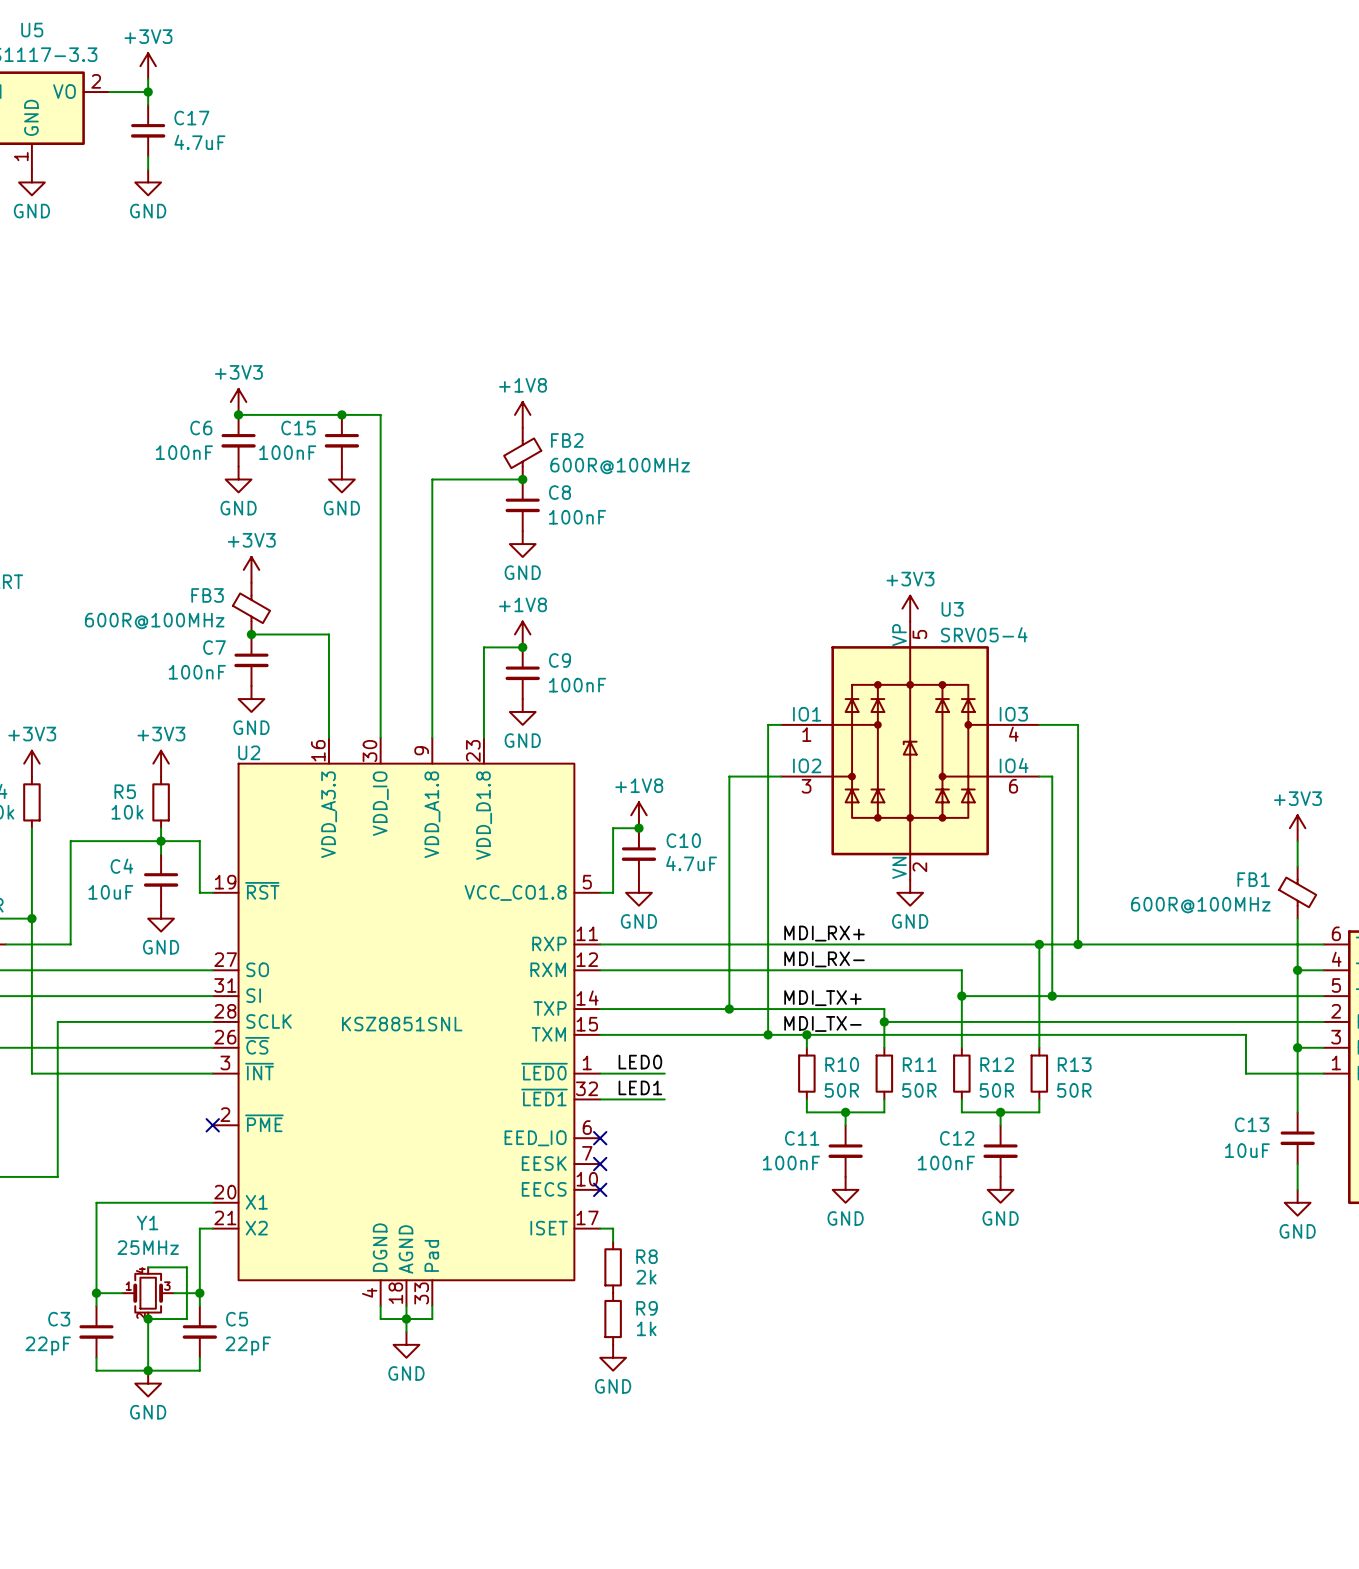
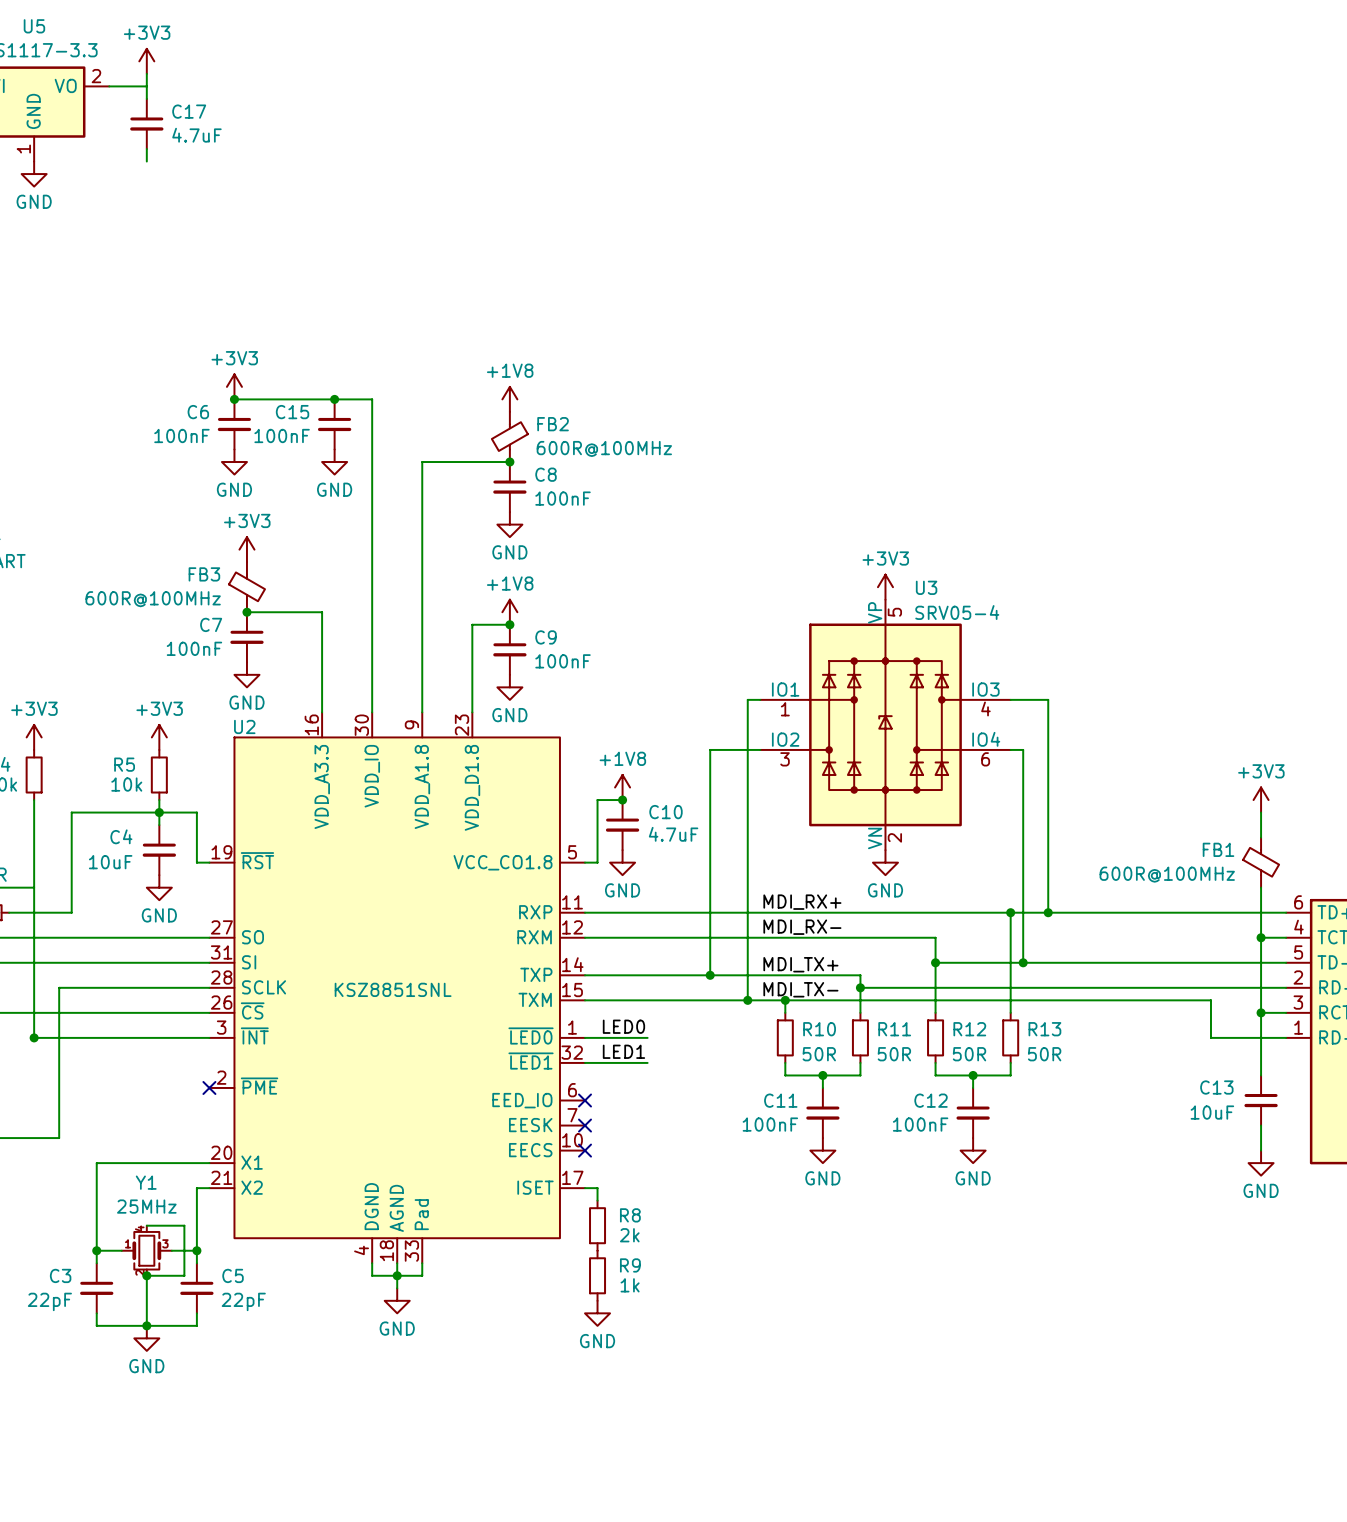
junction: (148, 92) -> none
power symbol: GND (148, 182) -> none
junction: (31, 918) -> none
junction: none -> (34, 1037)

